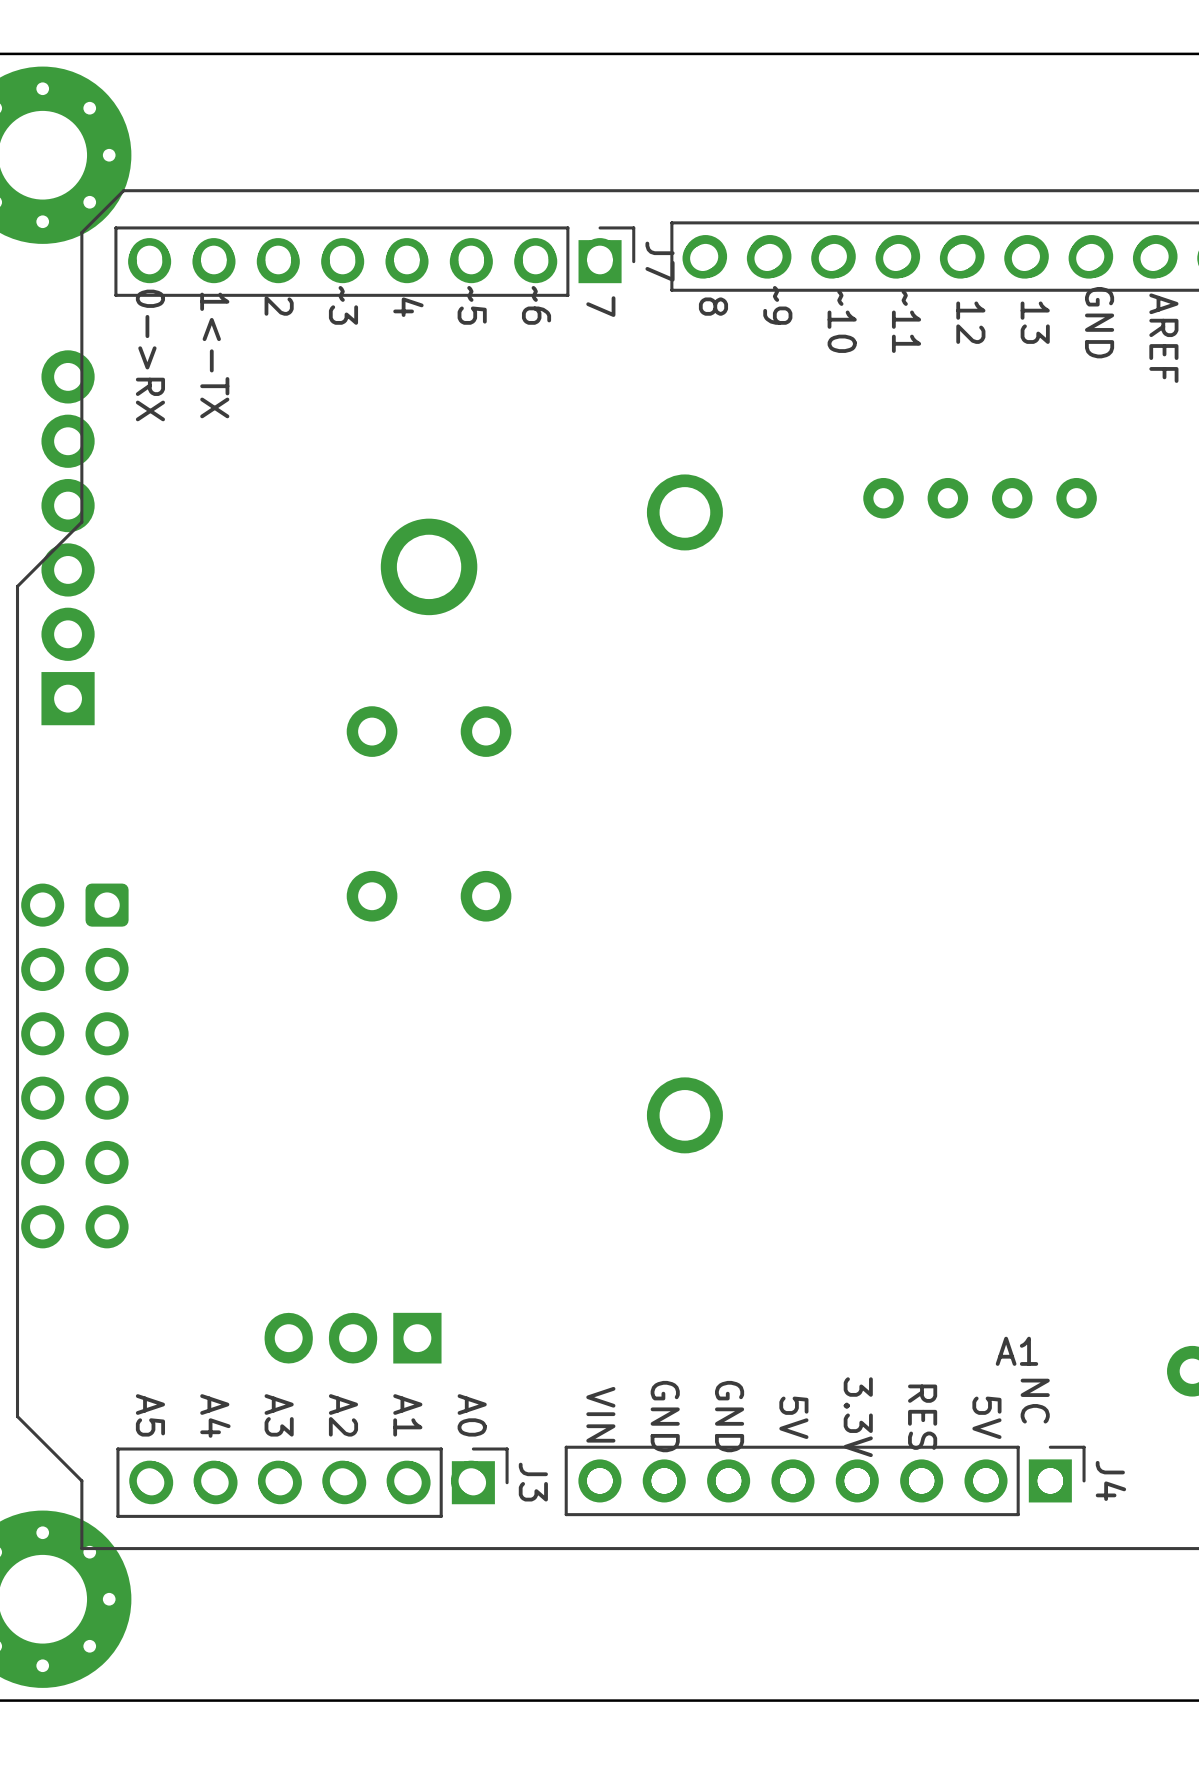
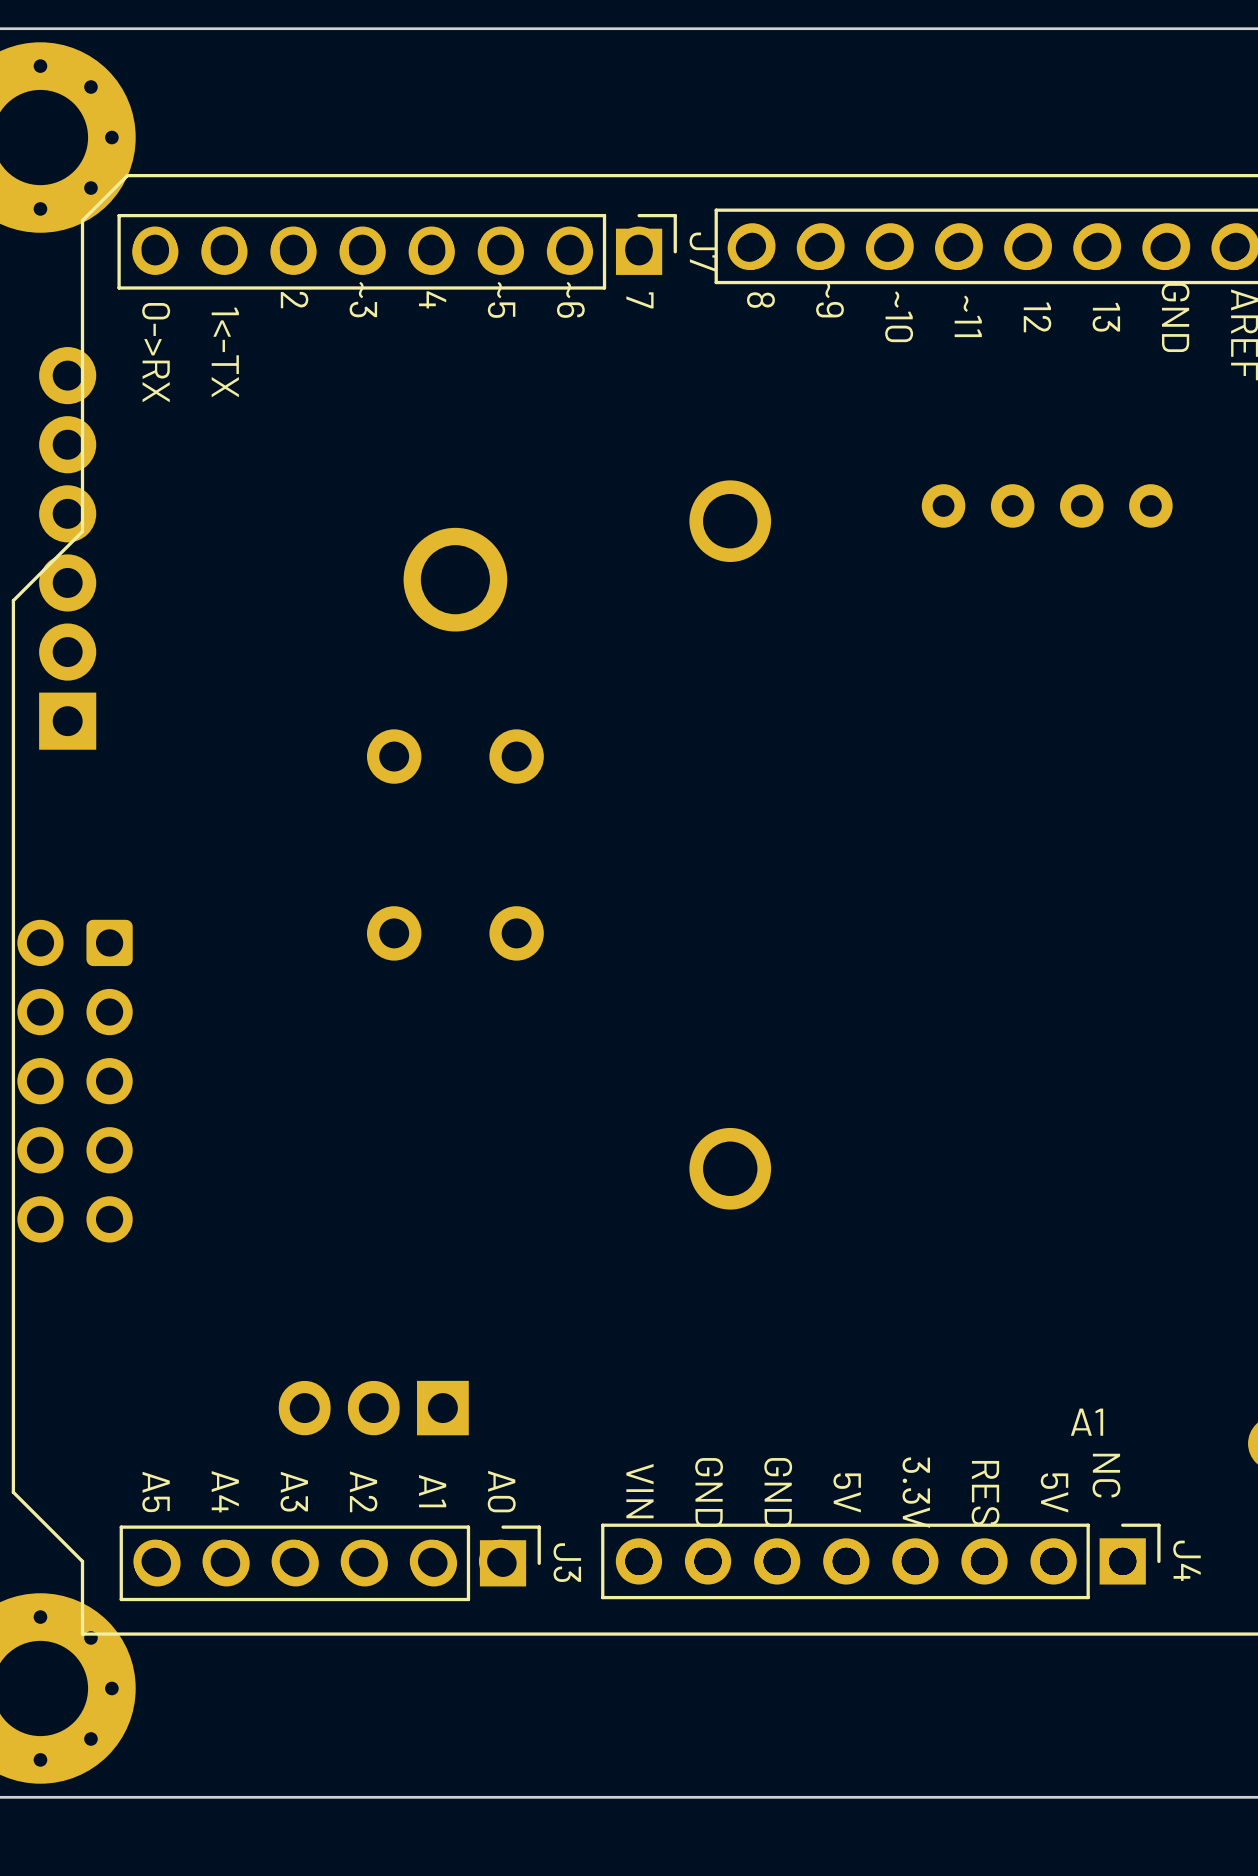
part: (74, 1065) -> none

